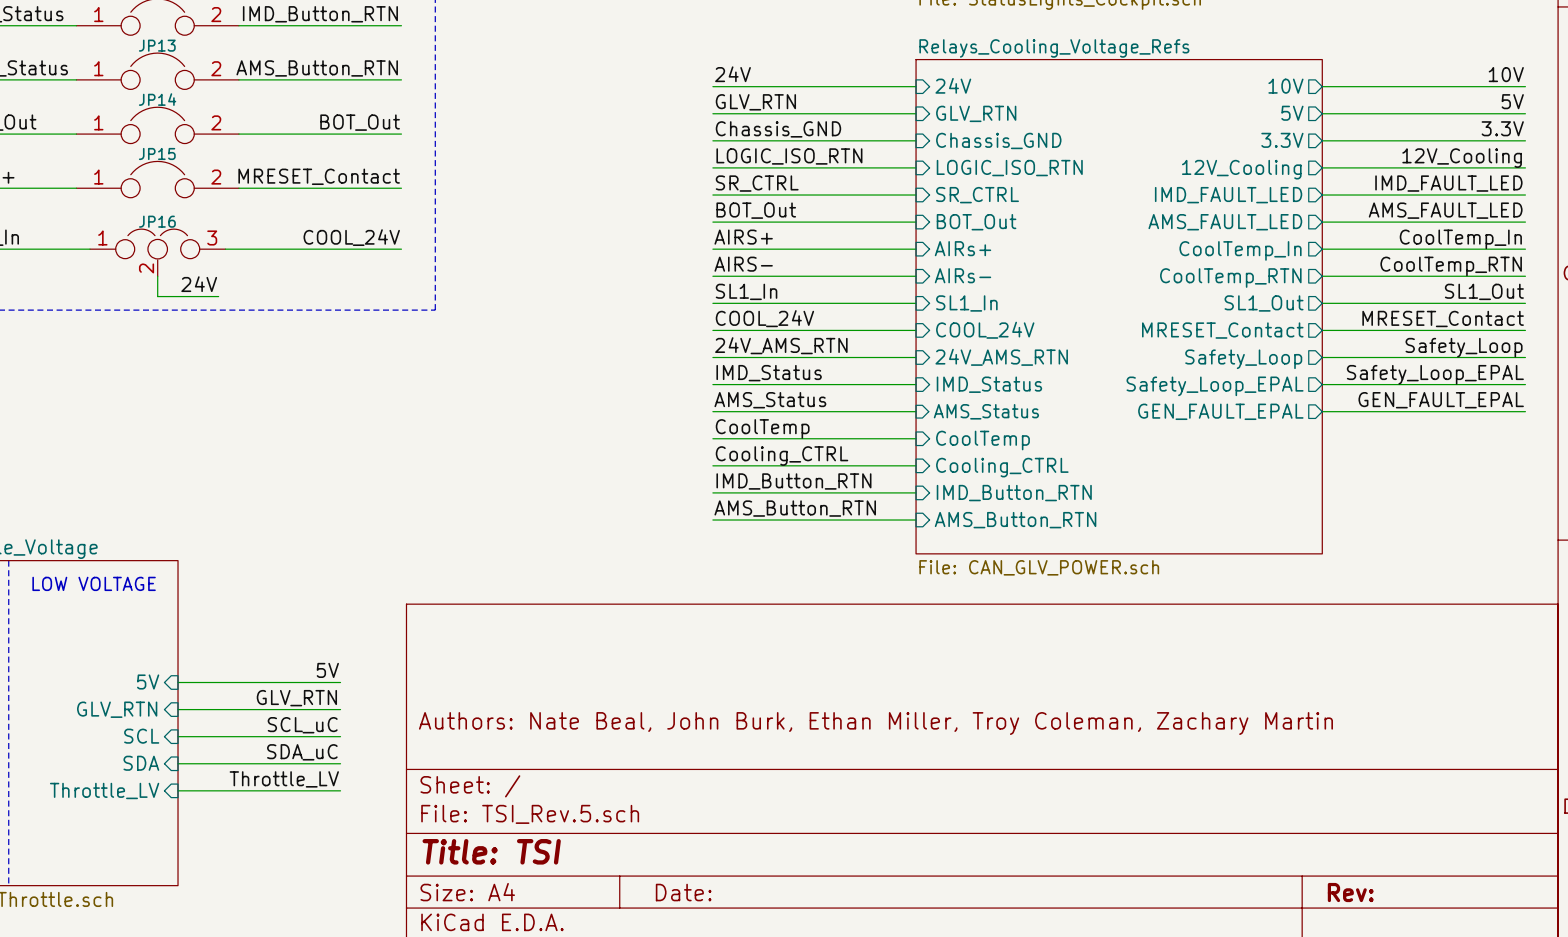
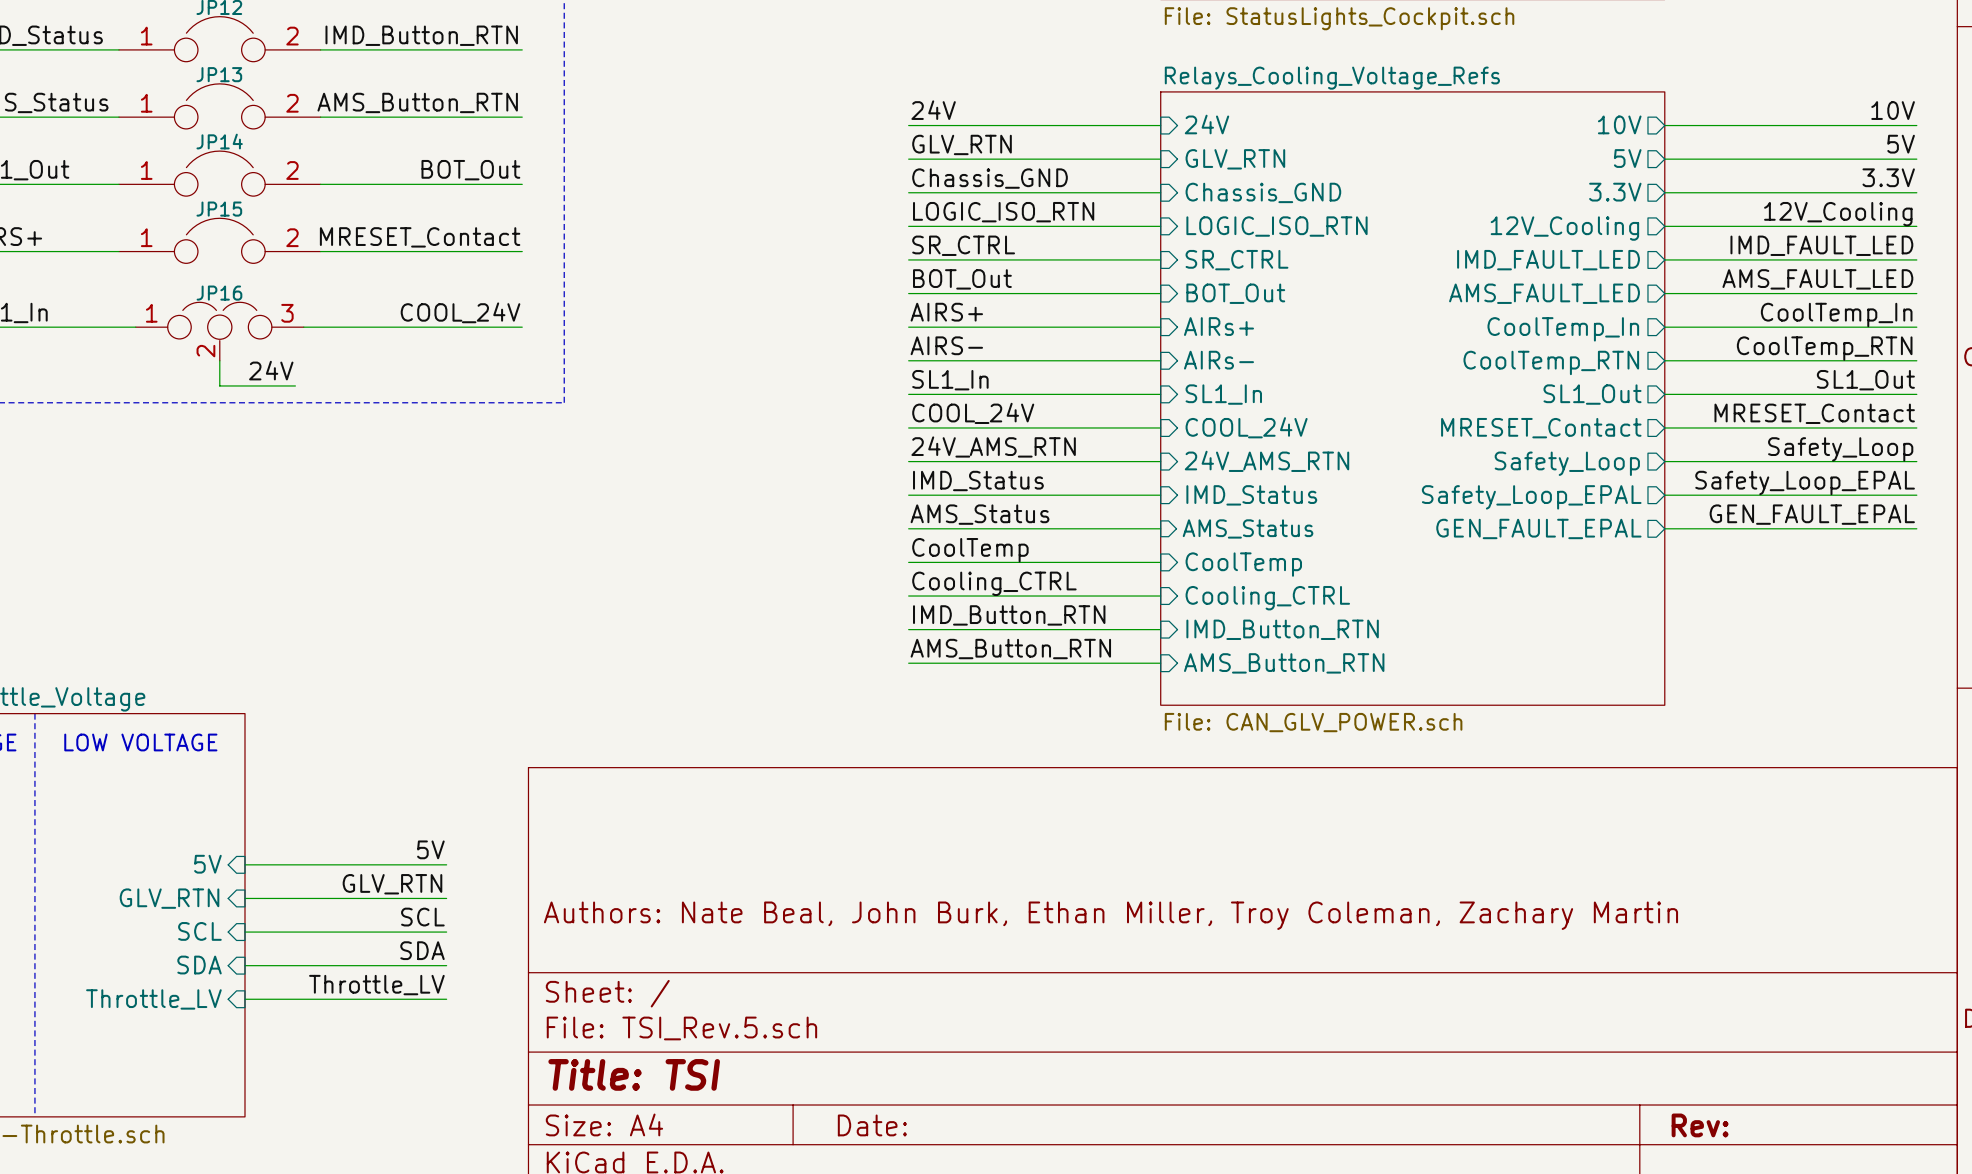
label: SCL_uC (302, 725) -> SCL (422, 917)
label: SDA_uC (302, 752) -> SDA (422, 950)

